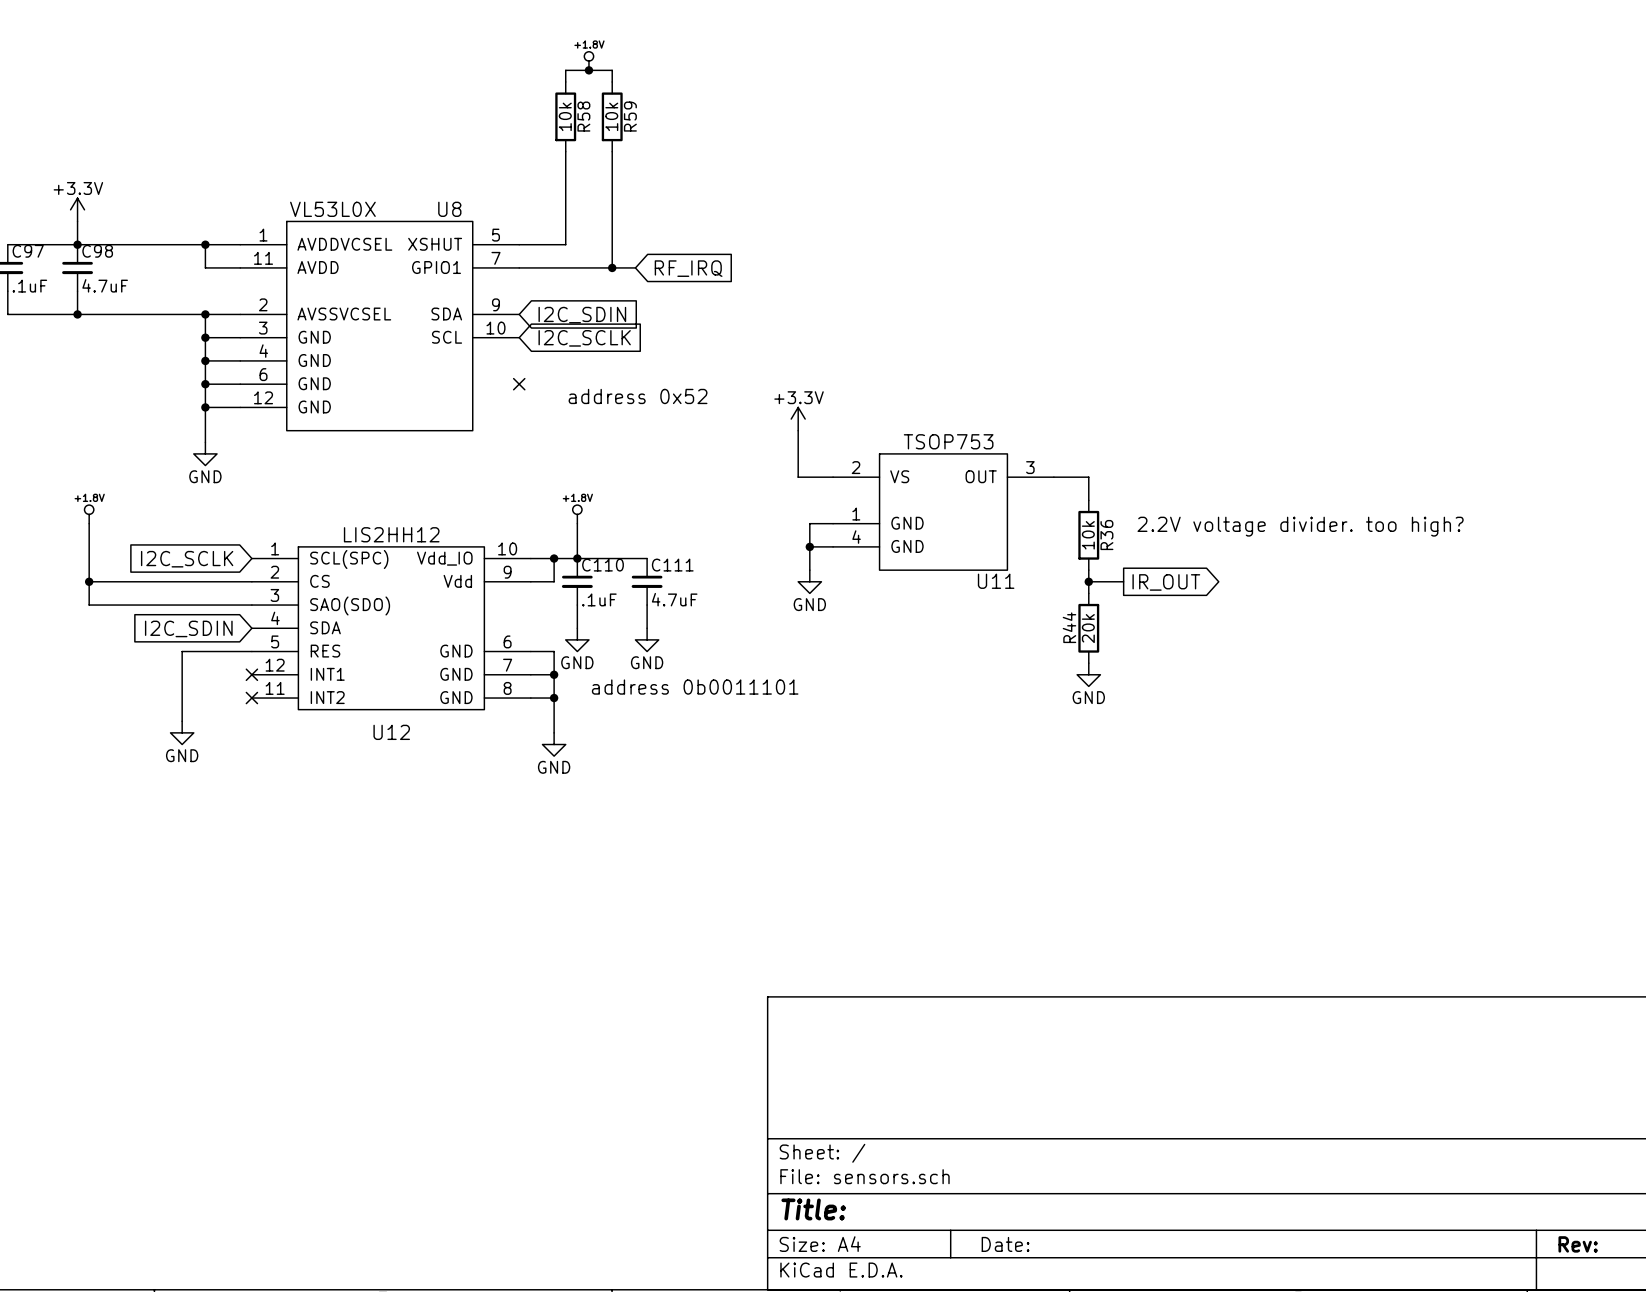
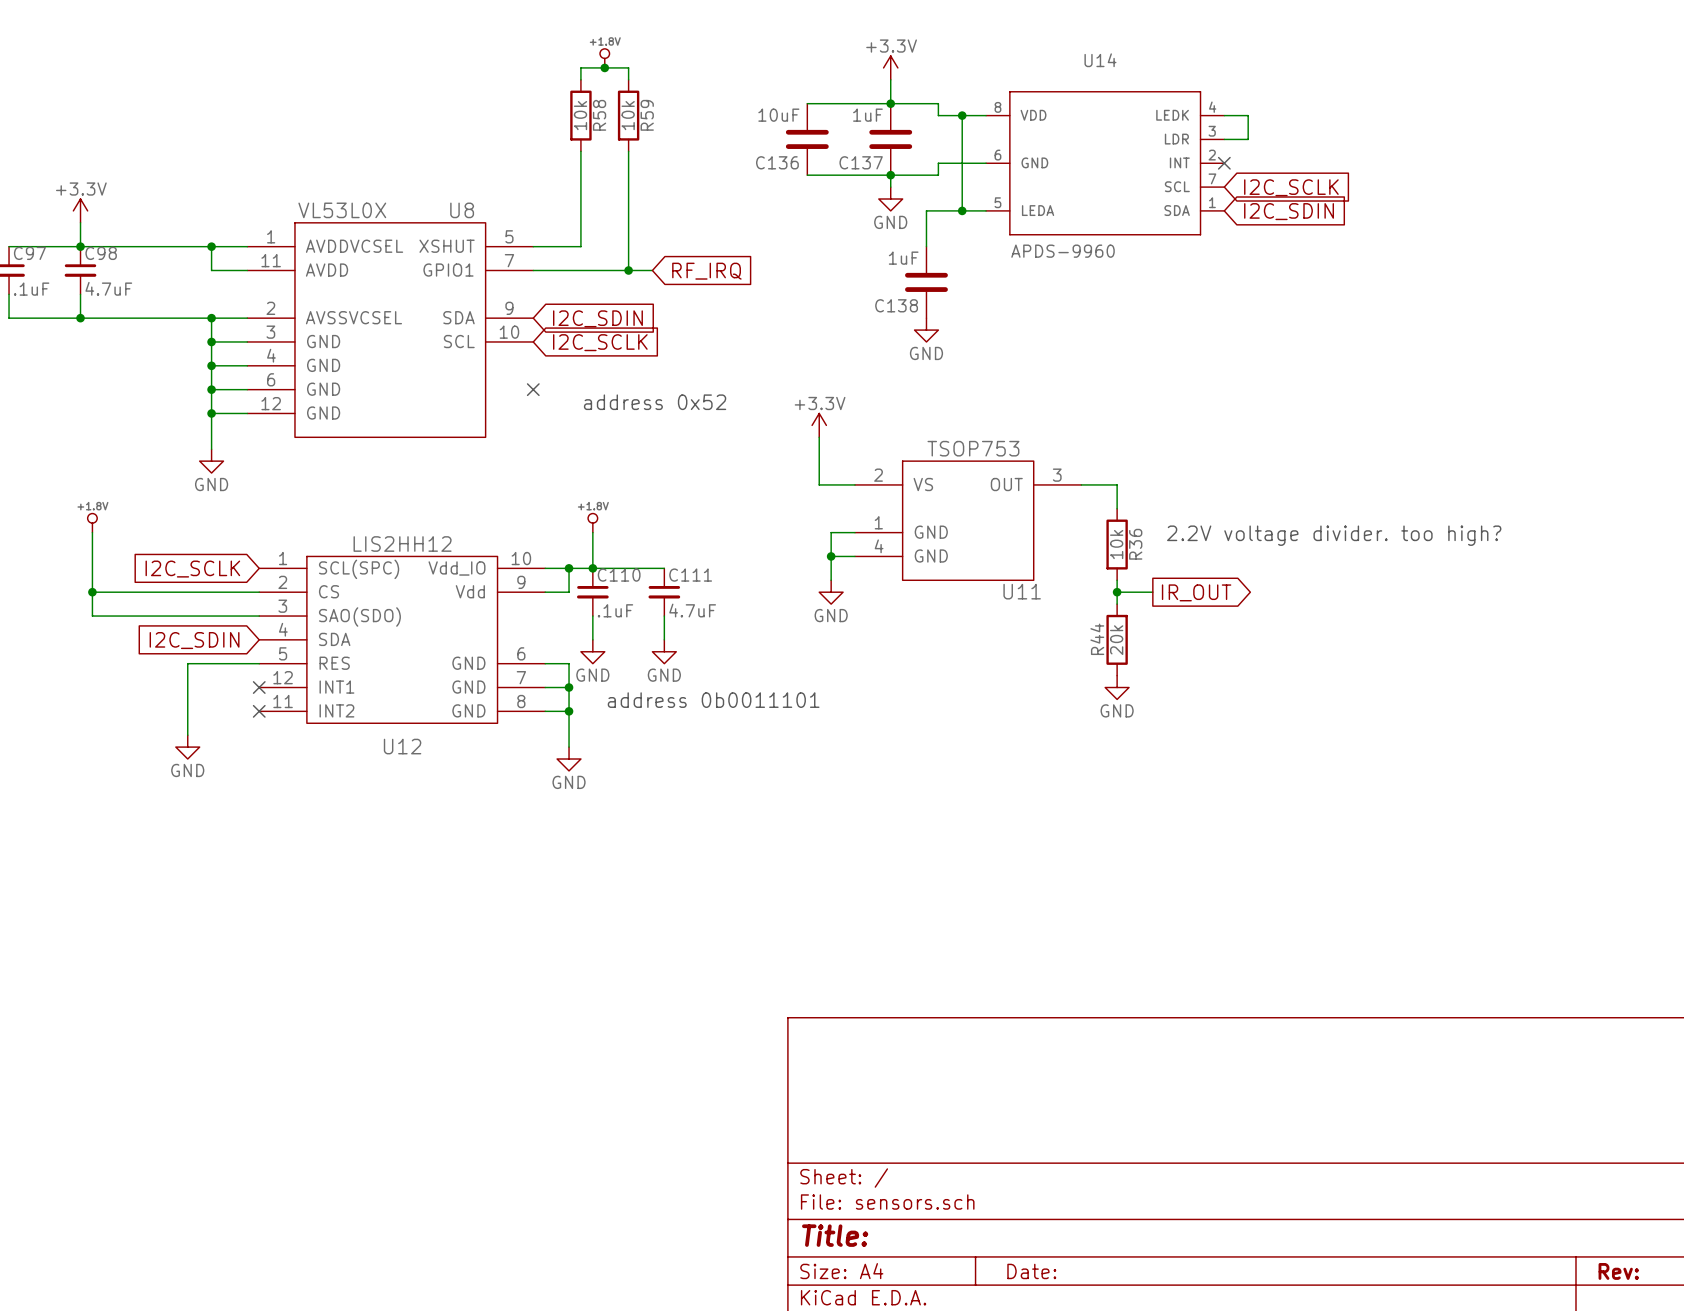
power symbol: none -> +3.3V (890, 67)
wire: none -> (890, 79) (890, 103)
wire: none -> (807, 103) (938, 103) (938, 115) (986, 115)
junction: none -> (890, 103)
wire: none -> (962, 115) (962, 210)
junction: none -> (962, 115)
wire: none -> (1224, 115) (1248, 115) (1248, 139) (1224, 139)
C136: none -> 10uF (807, 139)
C137: none -> 1uF (890, 139)
wire: none -> (986, 163) (938, 163) (938, 175) (807, 175)
U14: none -> APDS-9960 (1105, 163)
no-connect mark: none -> (1224, 163)
wire: none -> (890, 175) (890, 187)
junction: none -> (890, 175)
global label: none -> I2C_SCLK (1291, 187)
power symbol: none -> GND (890, 199)
junction: none -> (962, 210)
wire: none -> (986, 210) (926, 210) (926, 246)
global label: none -> I2C_SDIN (1289, 211)
C138: none -> 1uF (926, 282)
power symbol: none -> GND (926, 330)

